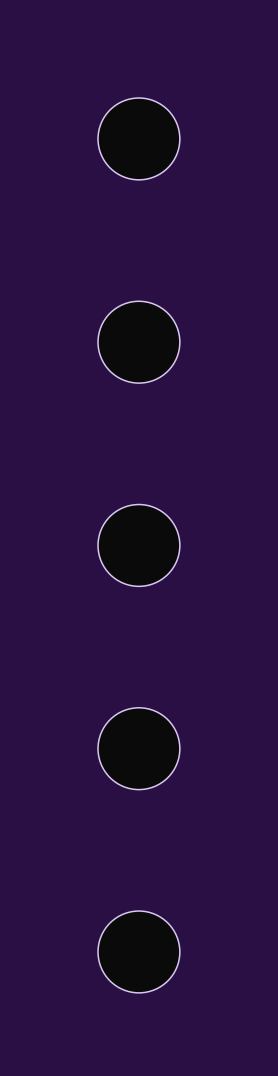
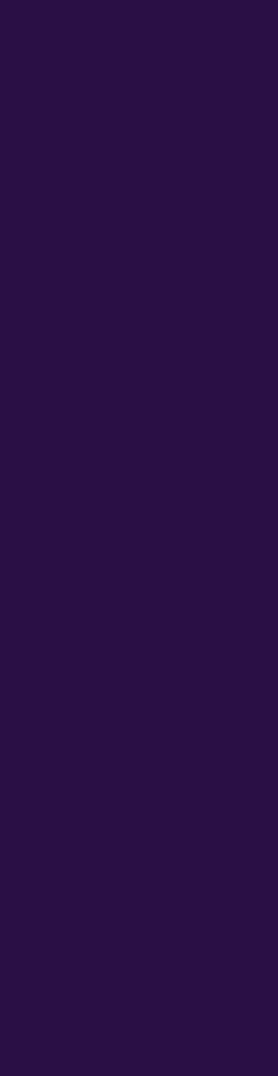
part: (138, 138) -> none
part: (138, 342) -> none
part: (138, 545) -> none
part: (138, 748) -> none
part: (138, 951) -> none

